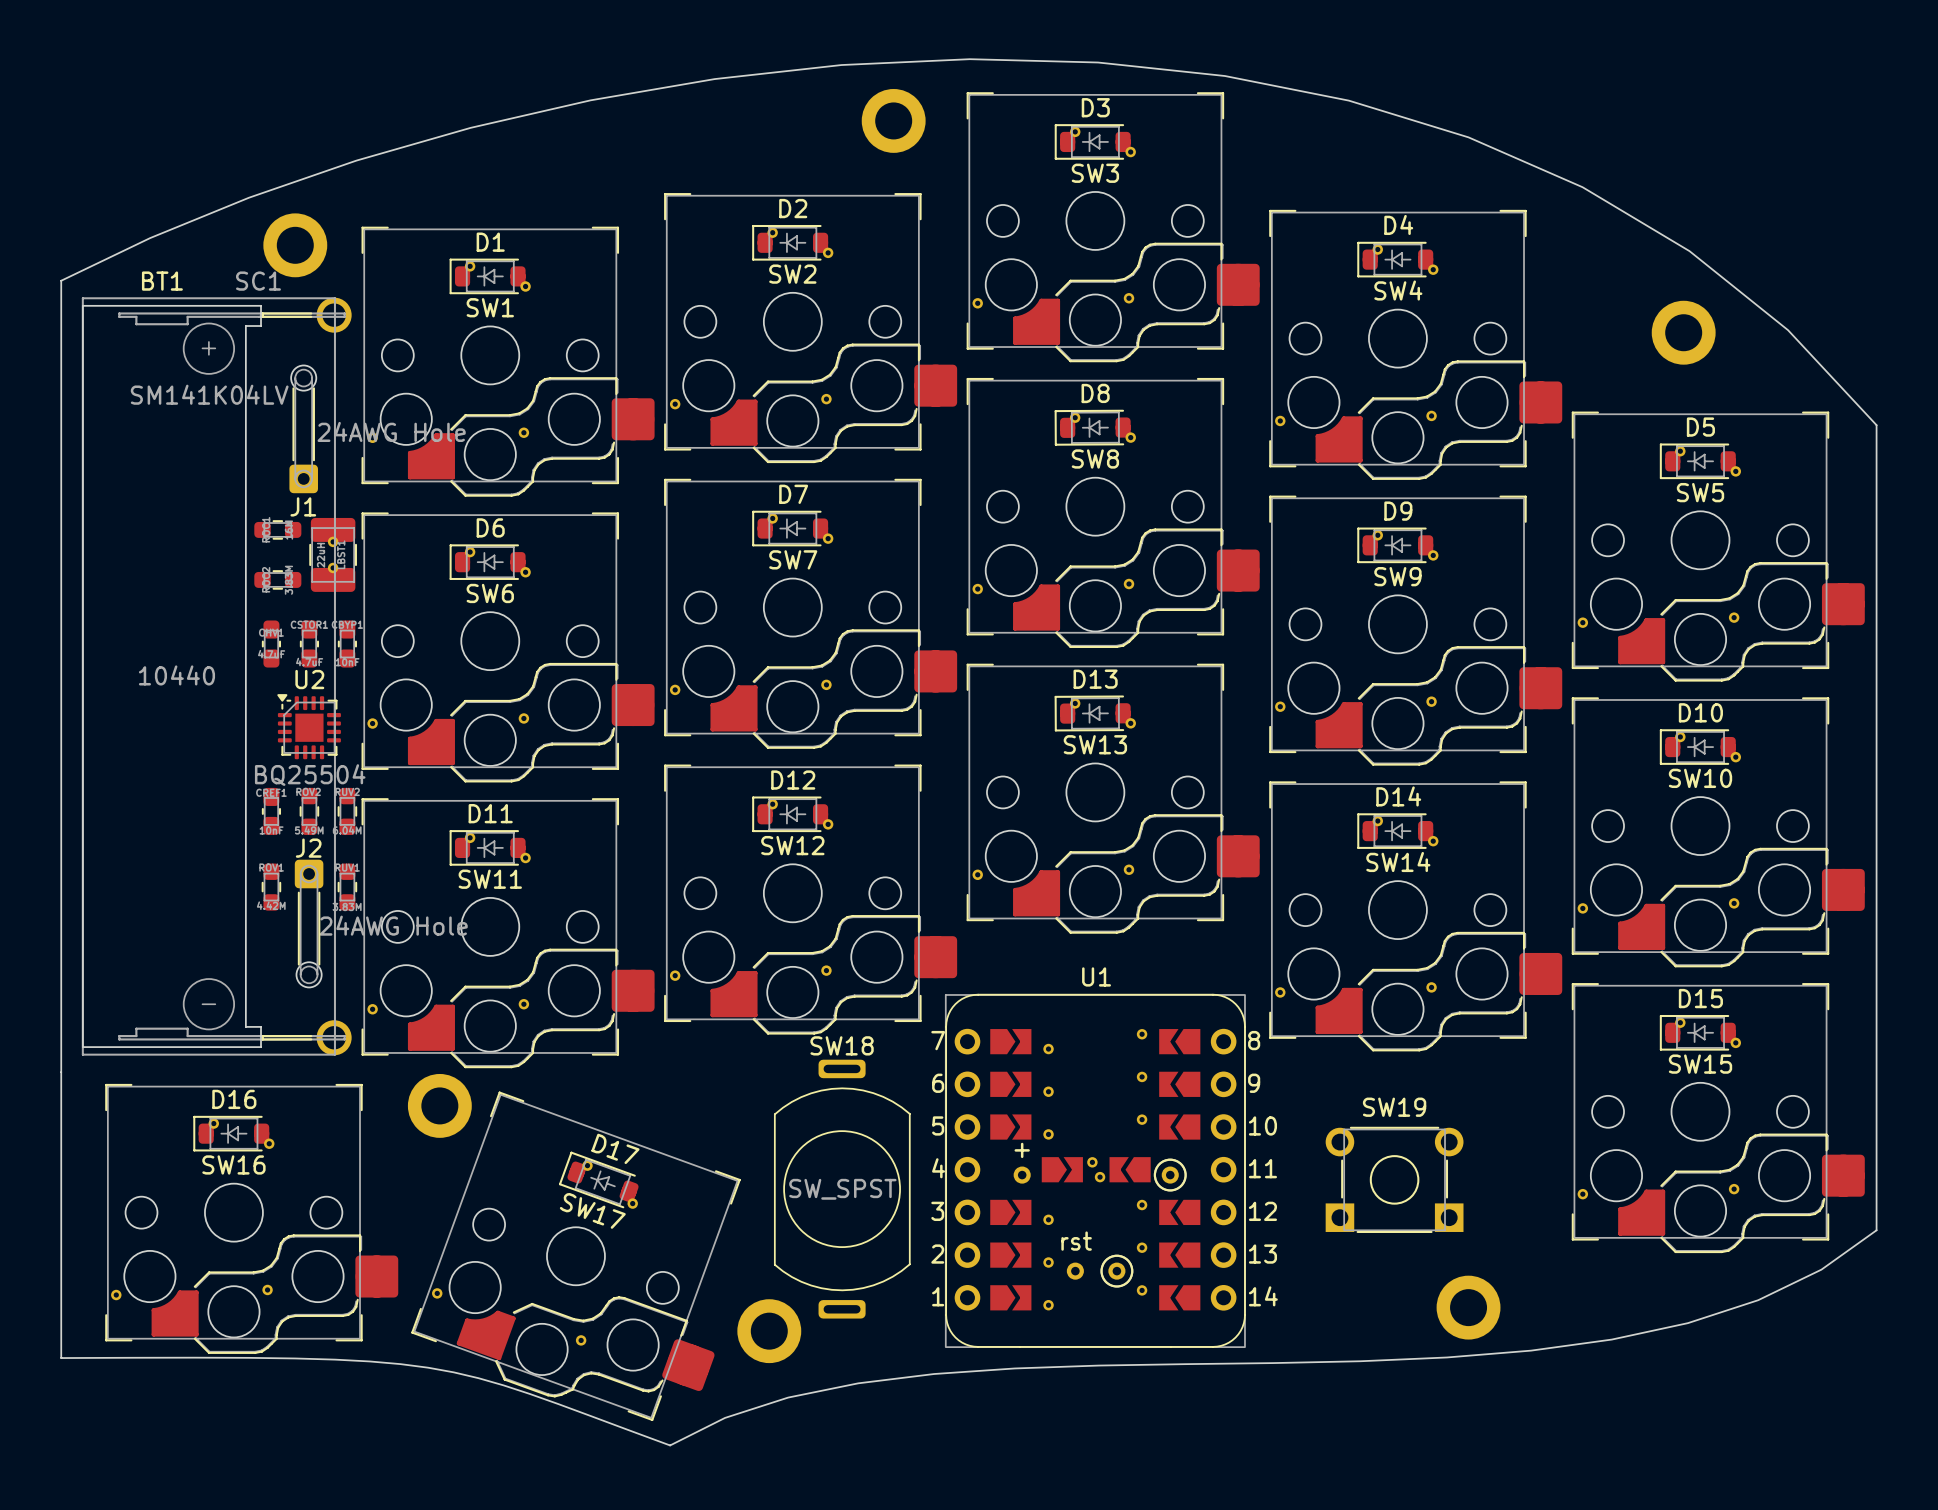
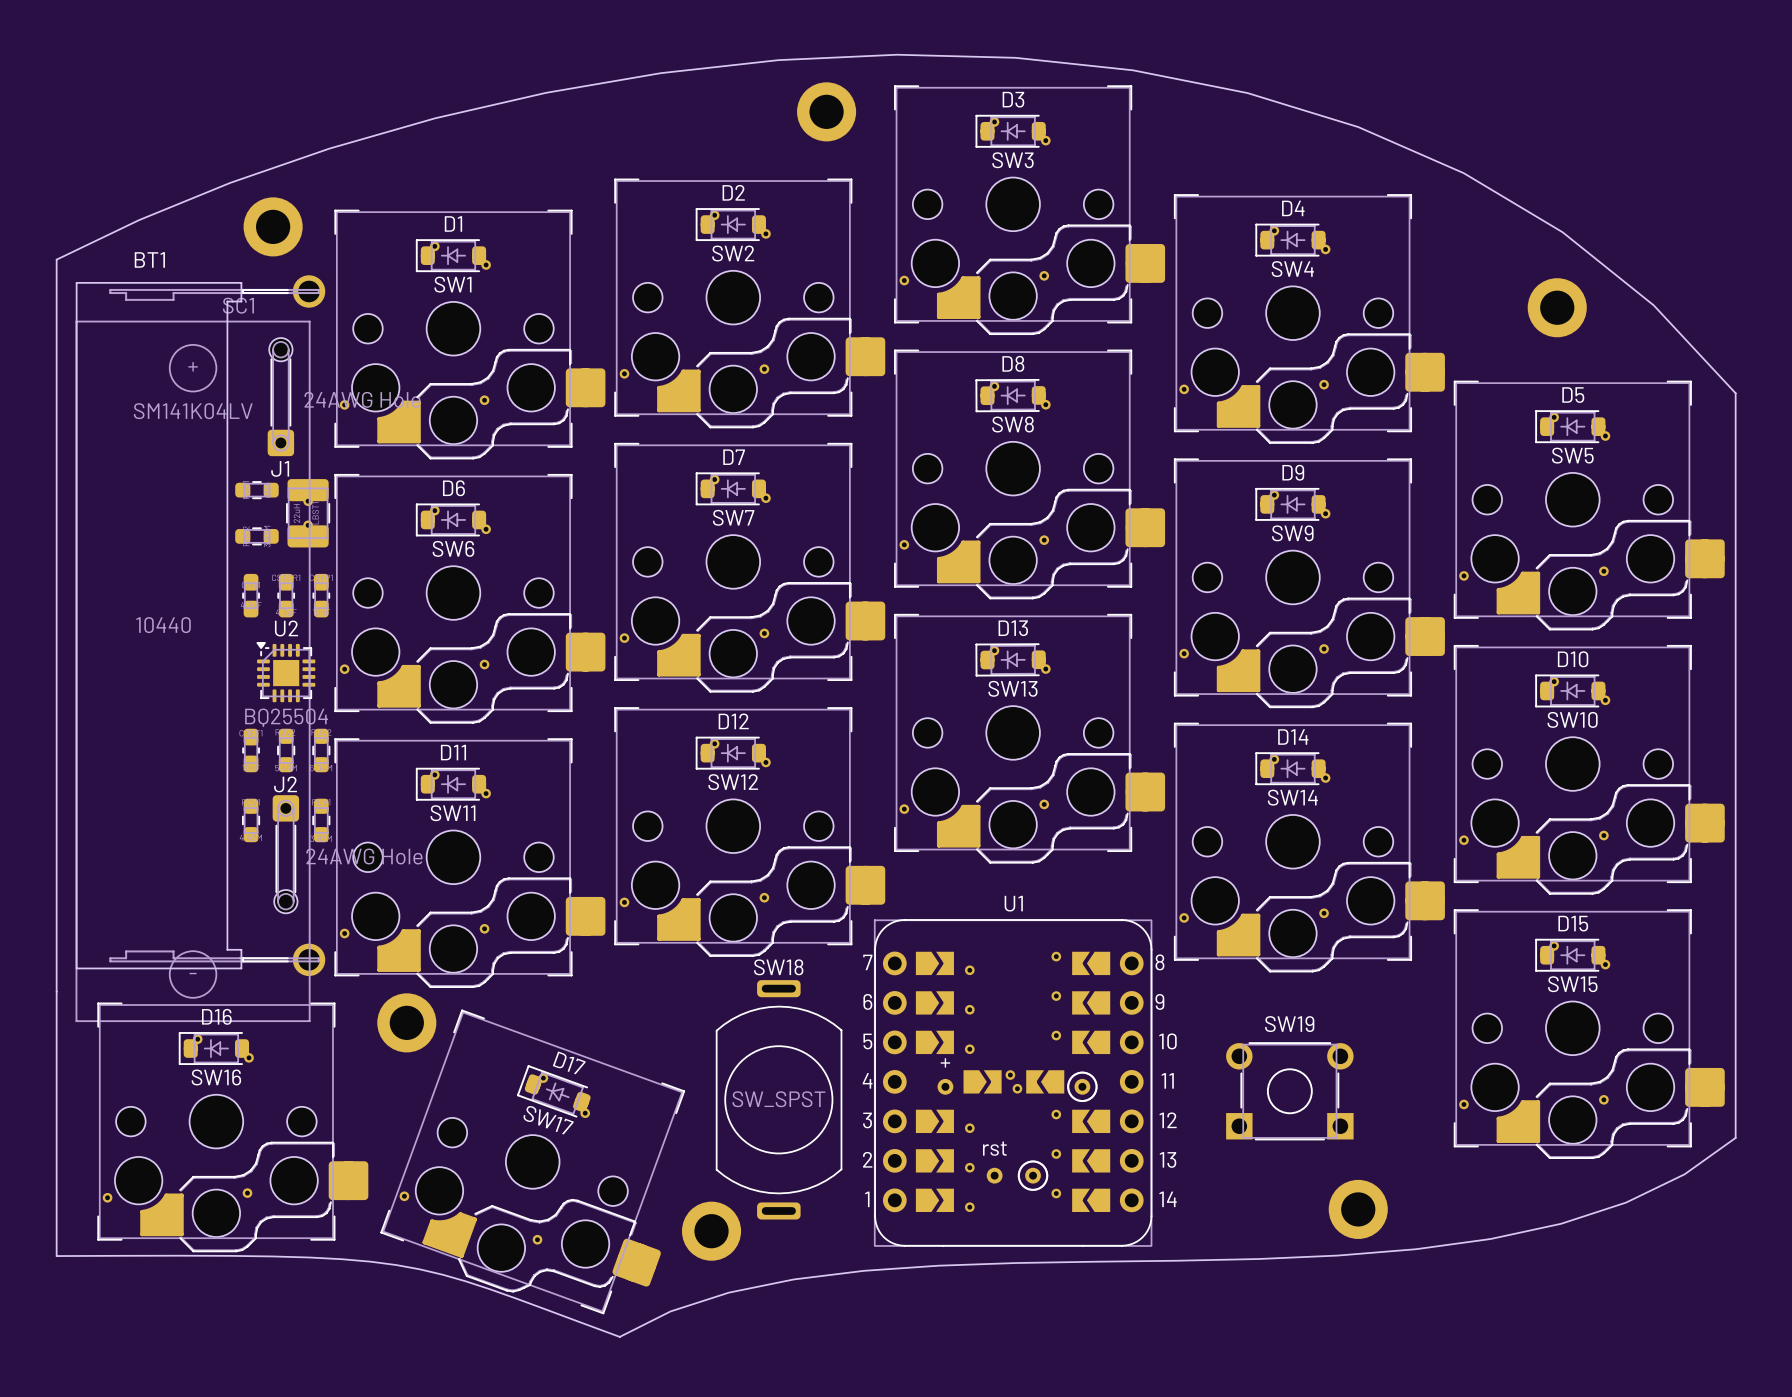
SC1 position: (208, 676) -> (193, 671)

